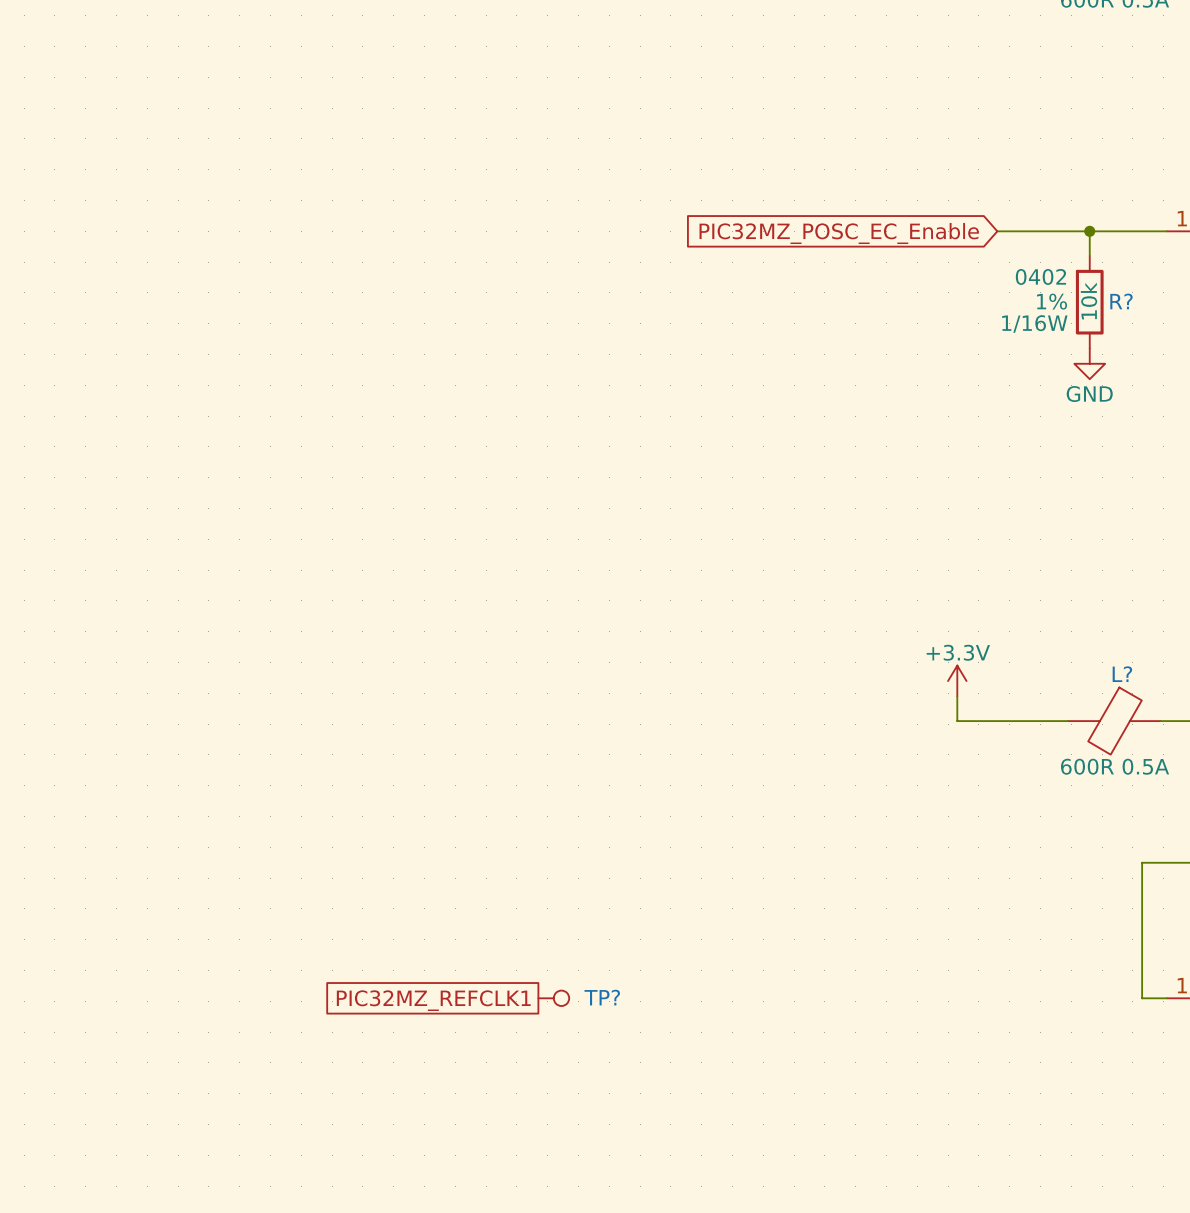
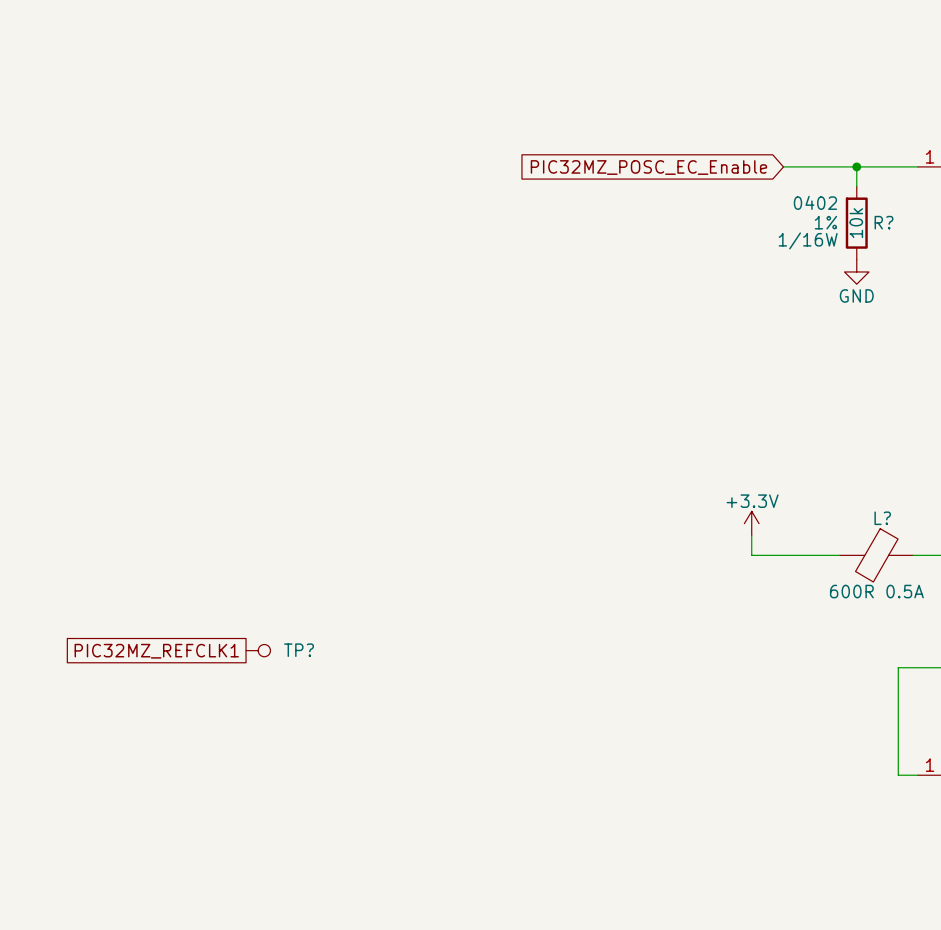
TP? position: (553, 998) -> (258, 650)
global label position: PIC32MZ_REFCLK1 (433, 1000) -> PIC32MZ_REFCLK1 (156, 651)

